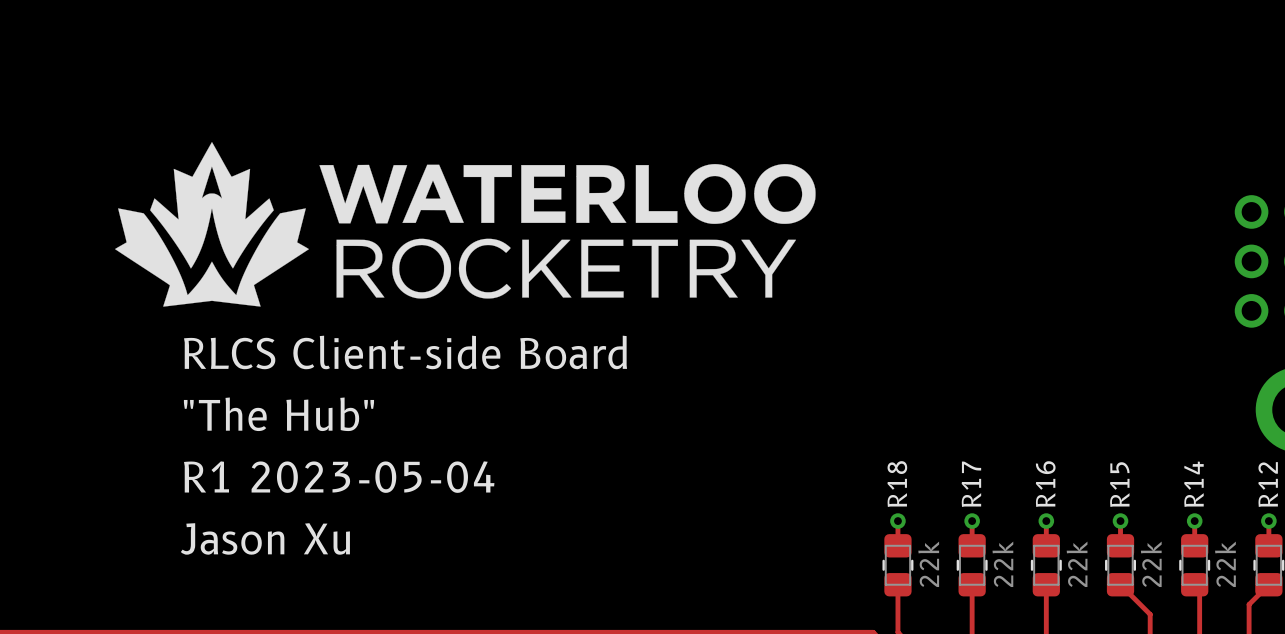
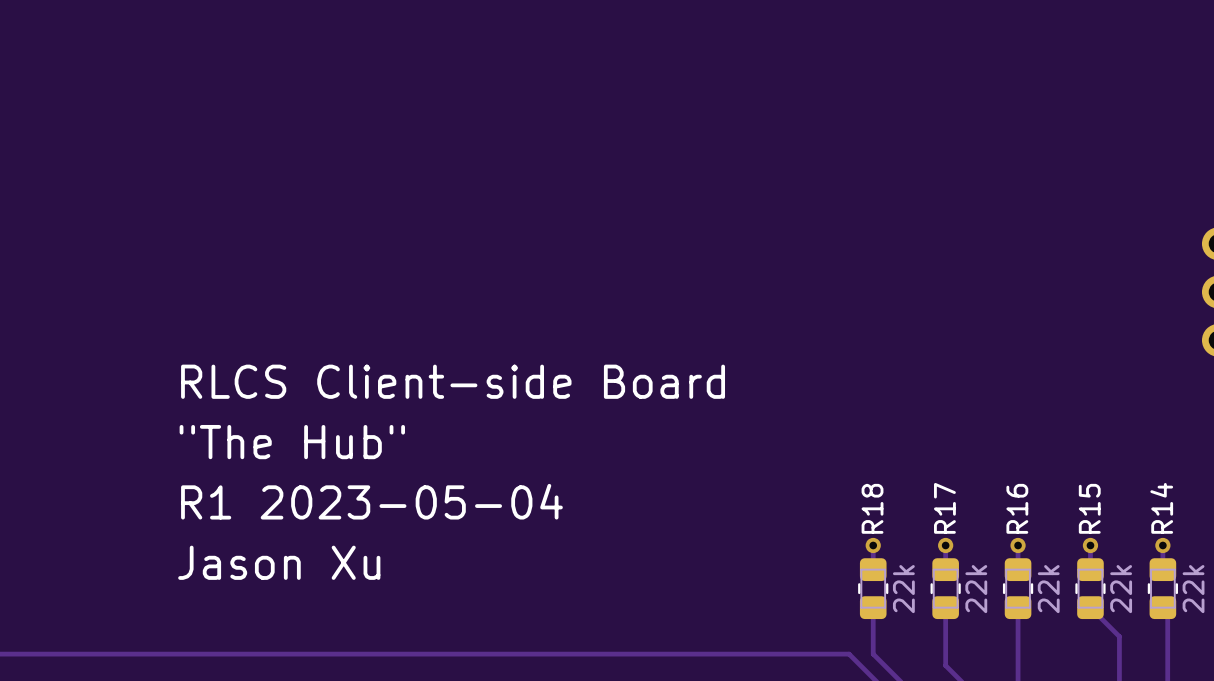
drawing: [115, 142, 816, 307] -> none

